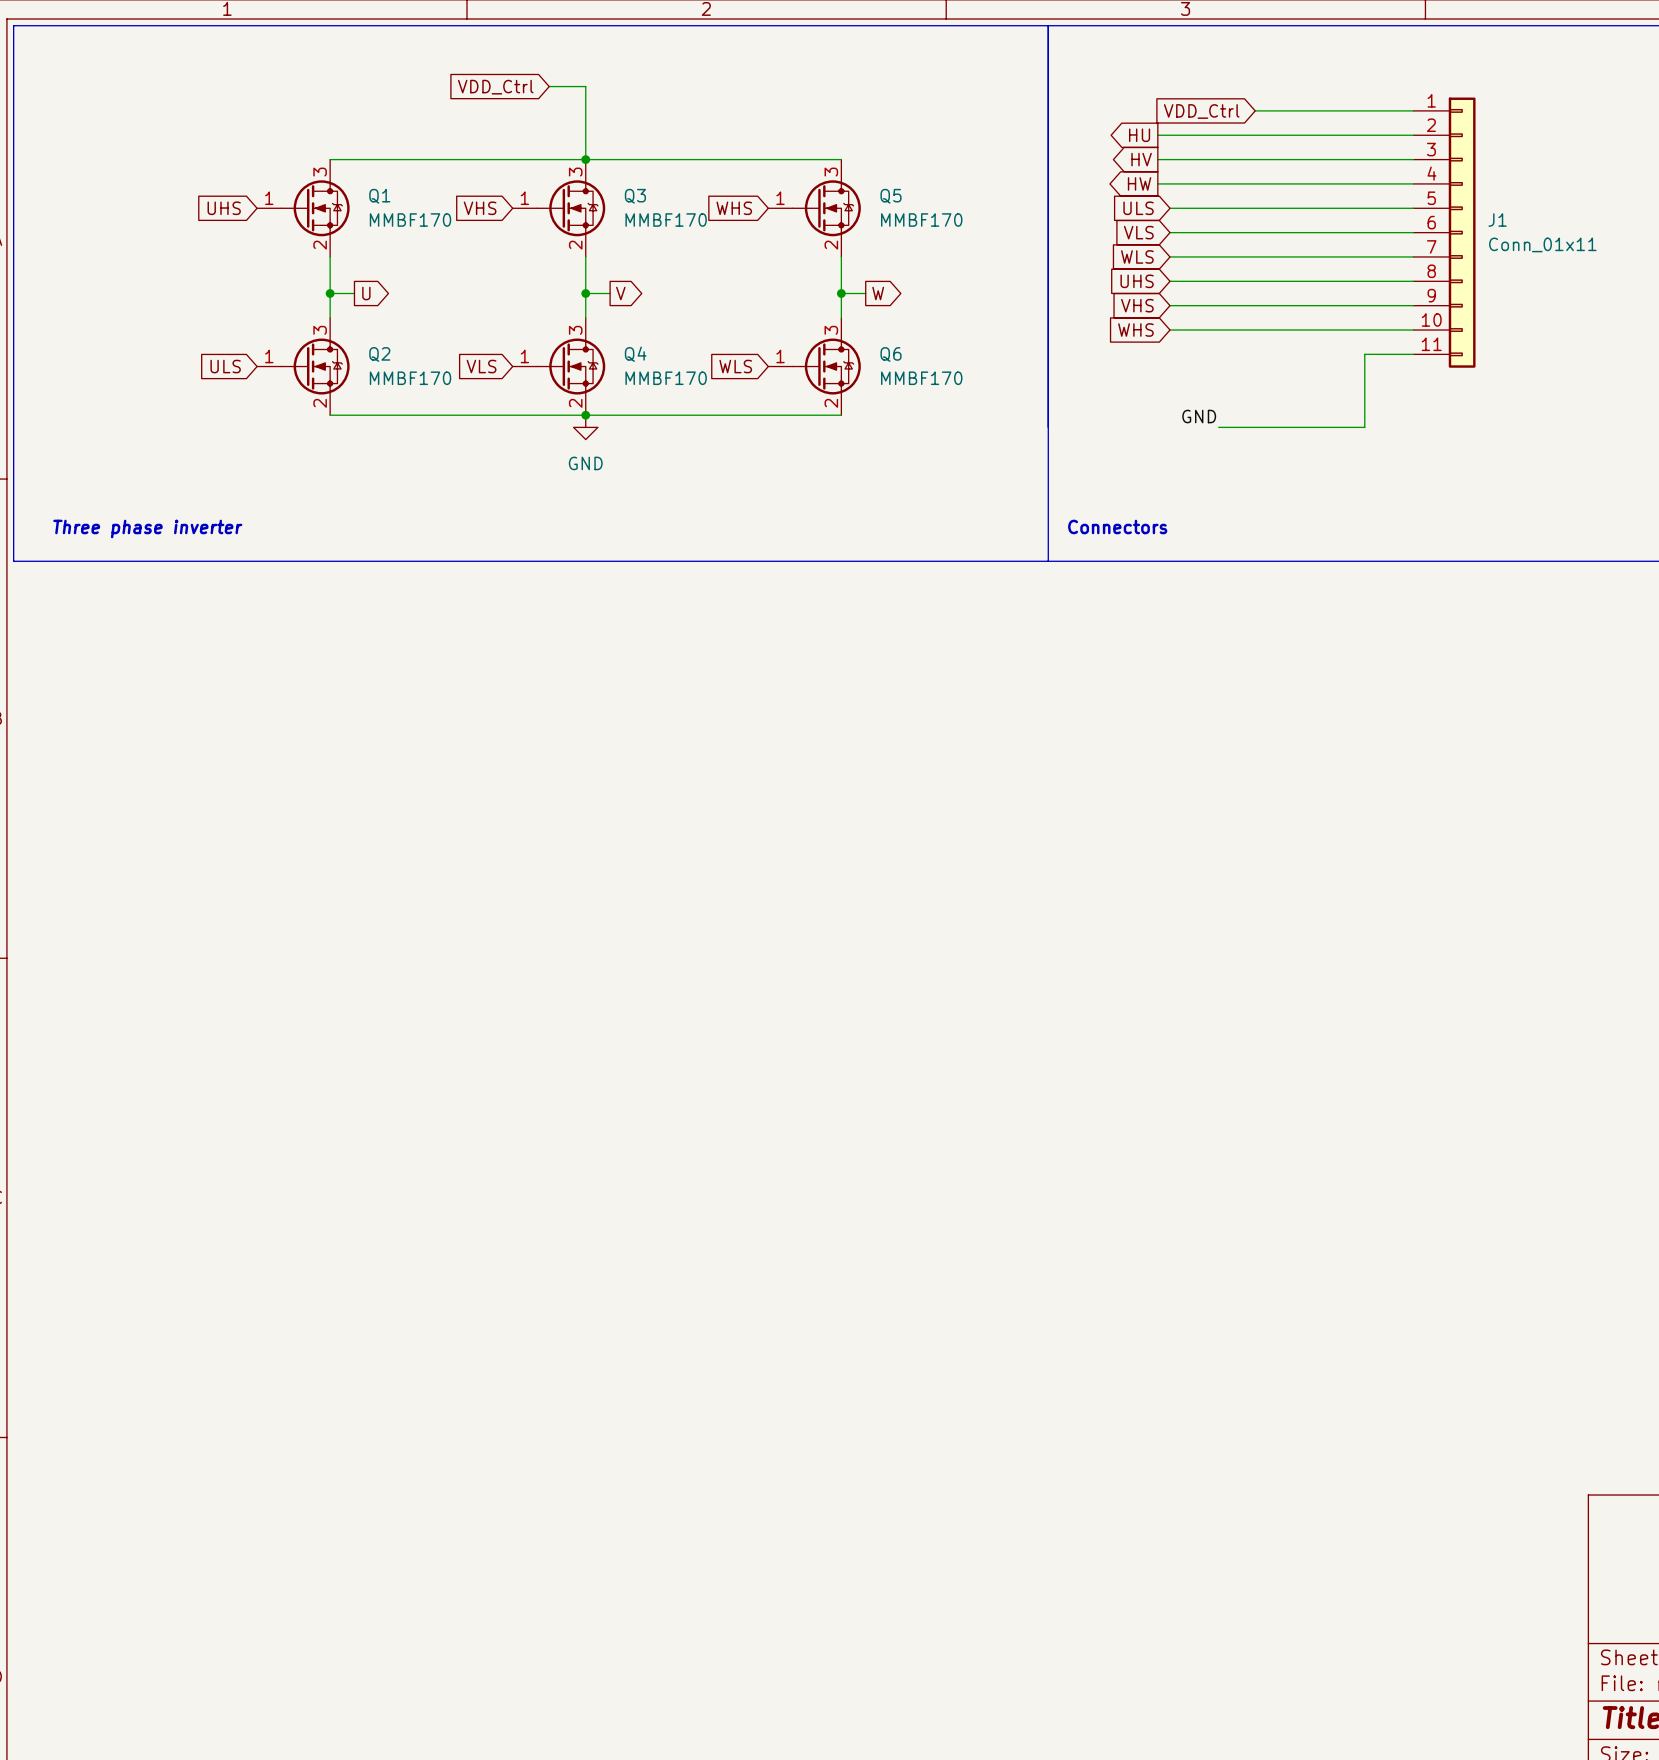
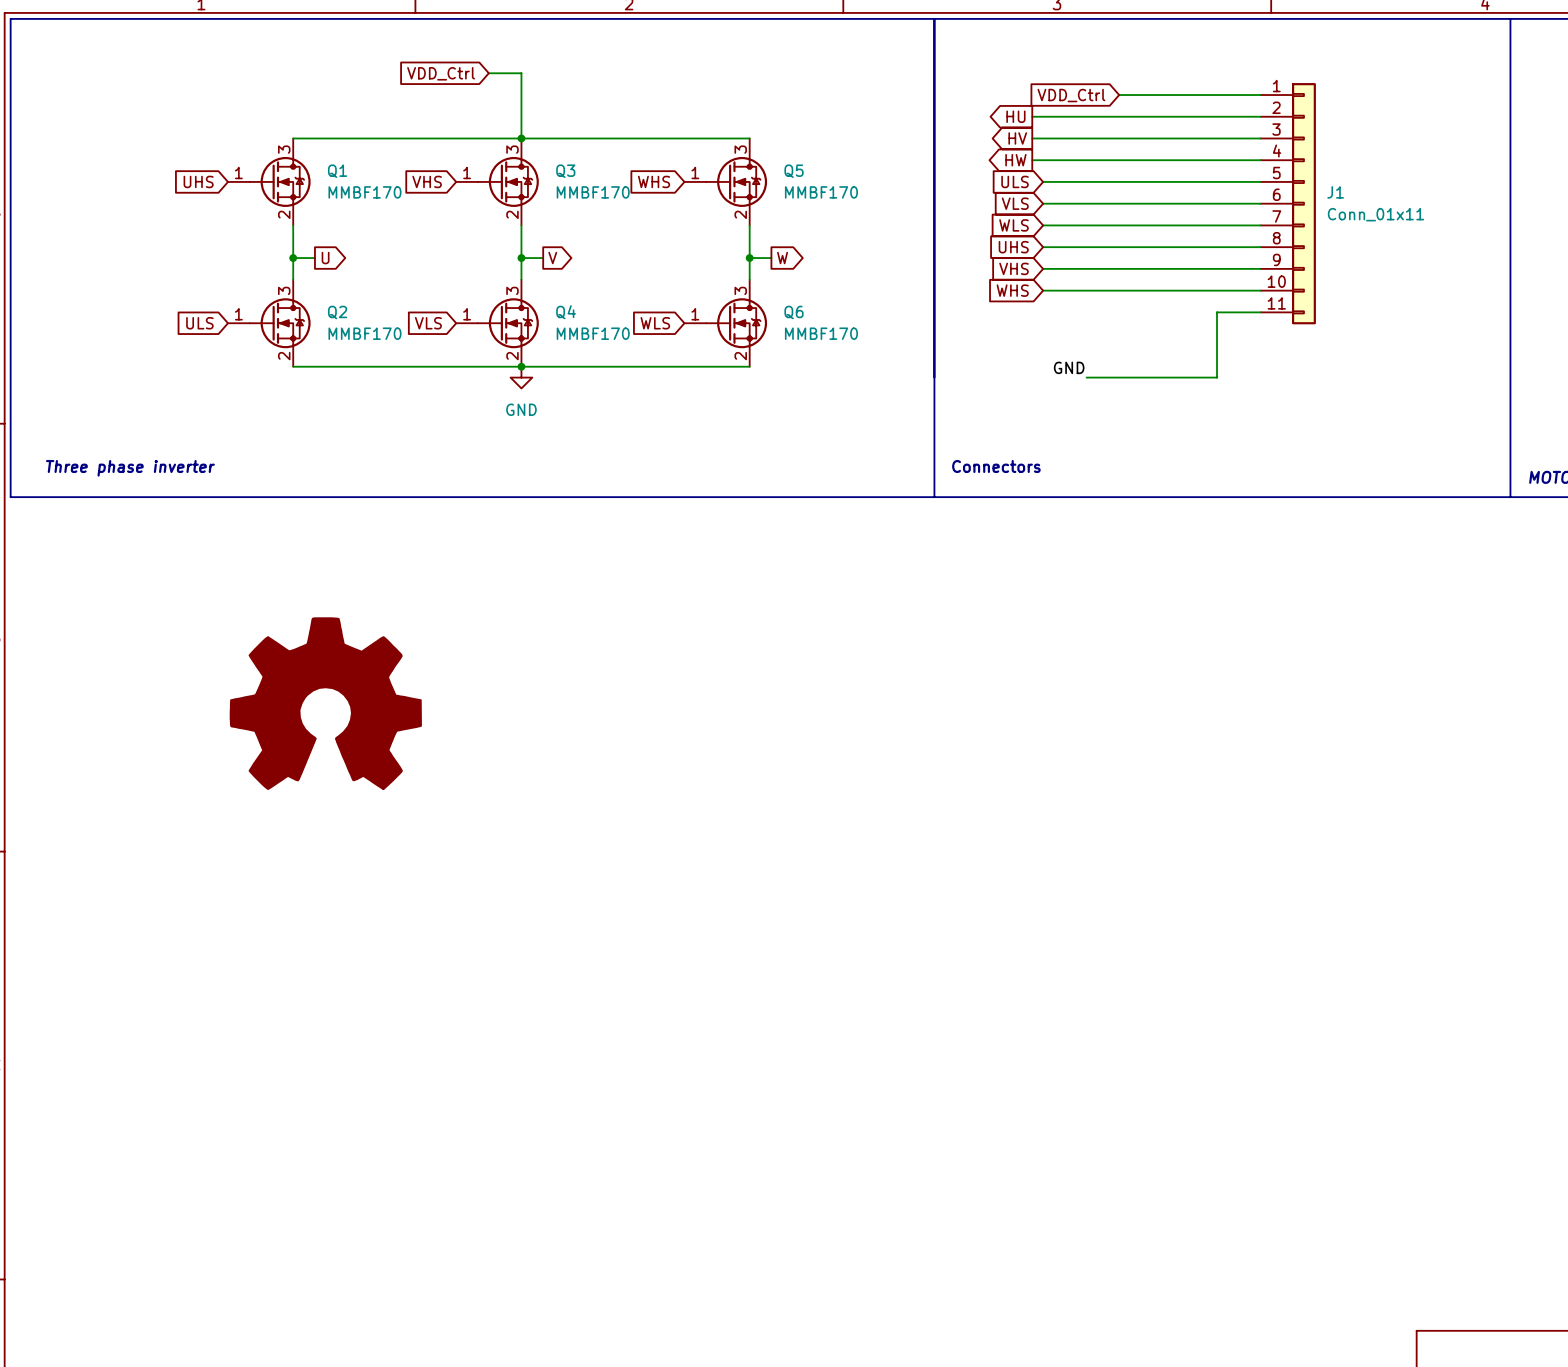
power symbol: none -> (325, 703)

